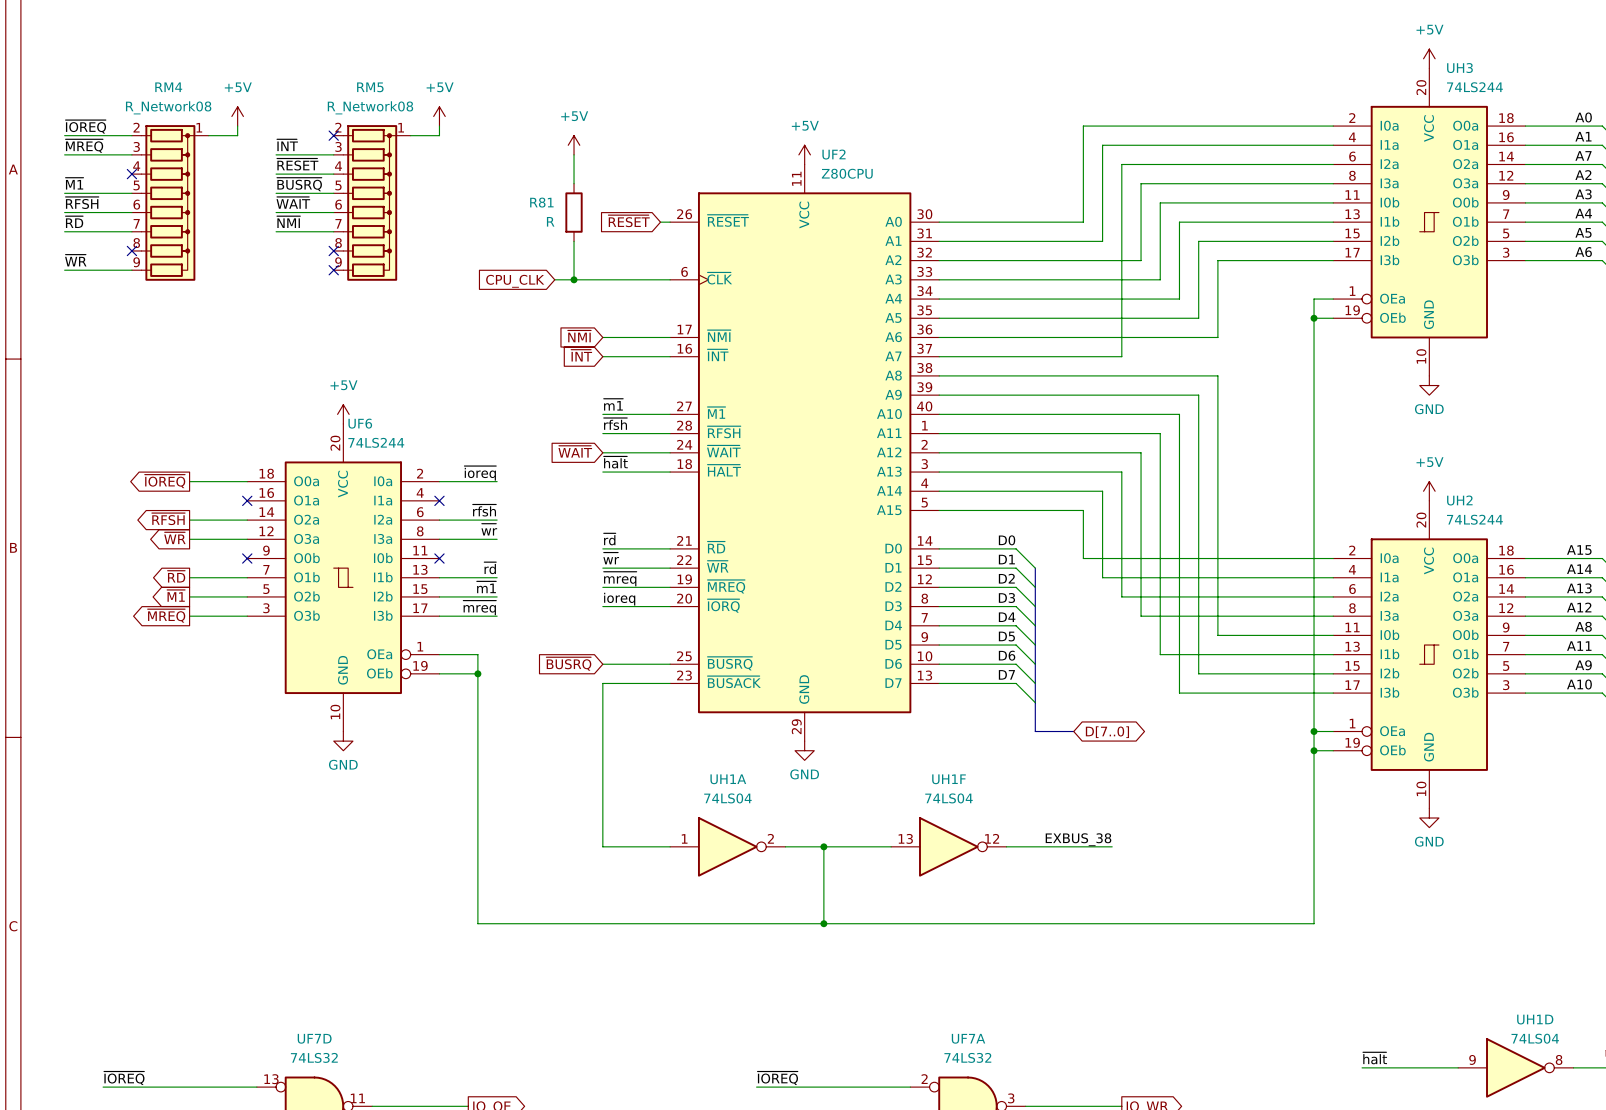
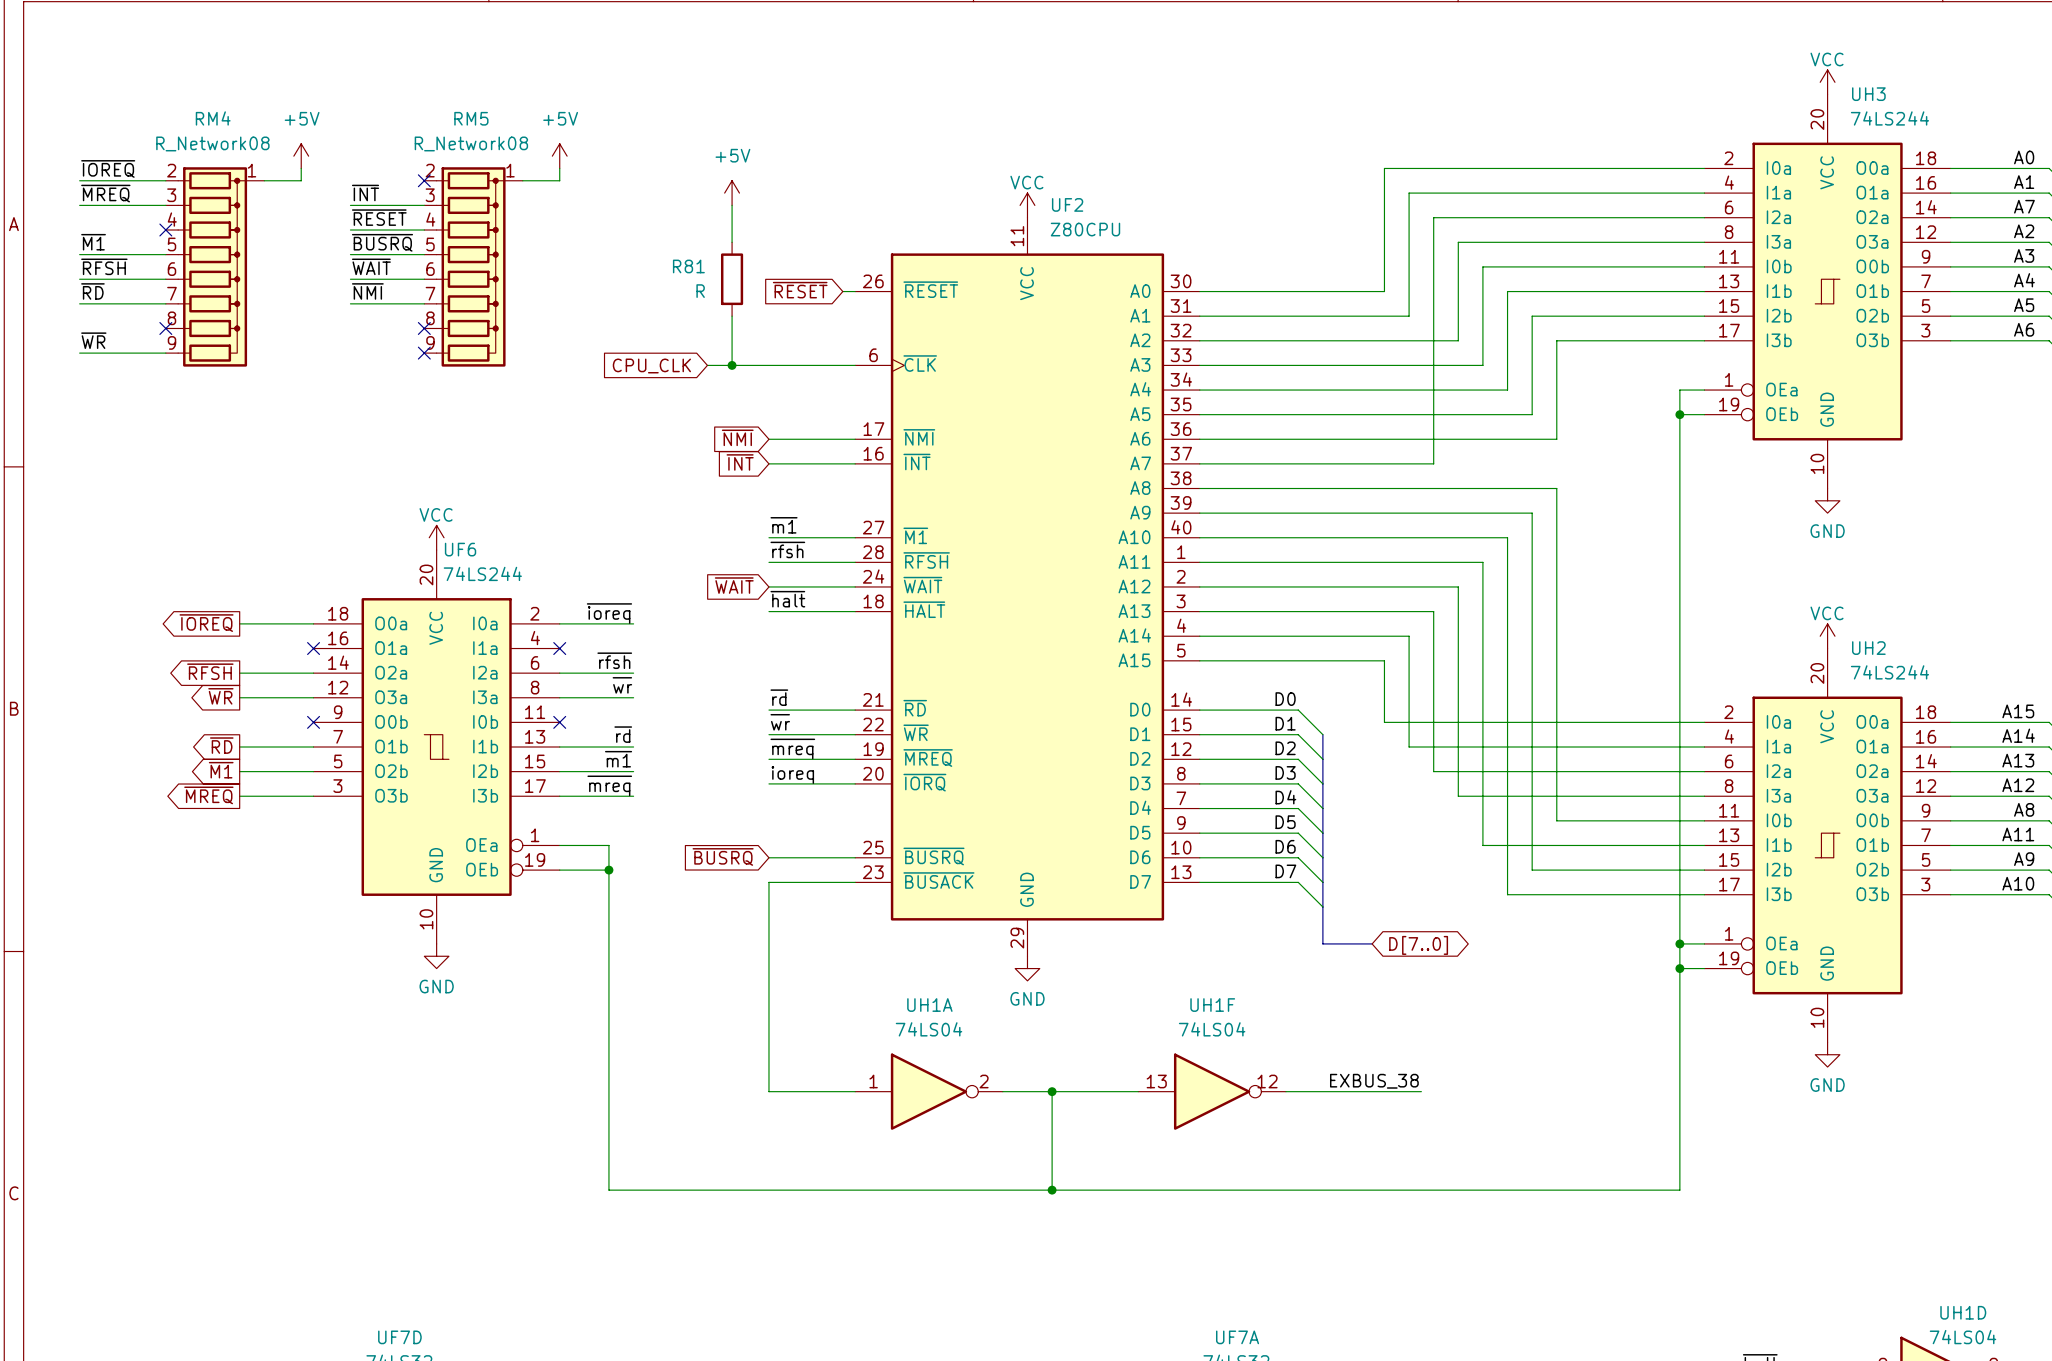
power symbol: +5V (1429, 58) -> VCC (1827, 82)
power symbol: +5V (804, 154) -> VCC (1027, 205)
power symbol: +5V (343, 414) -> VCC (436, 537)
power symbol: +5V (1429, 491) -> VCC (1827, 636)

